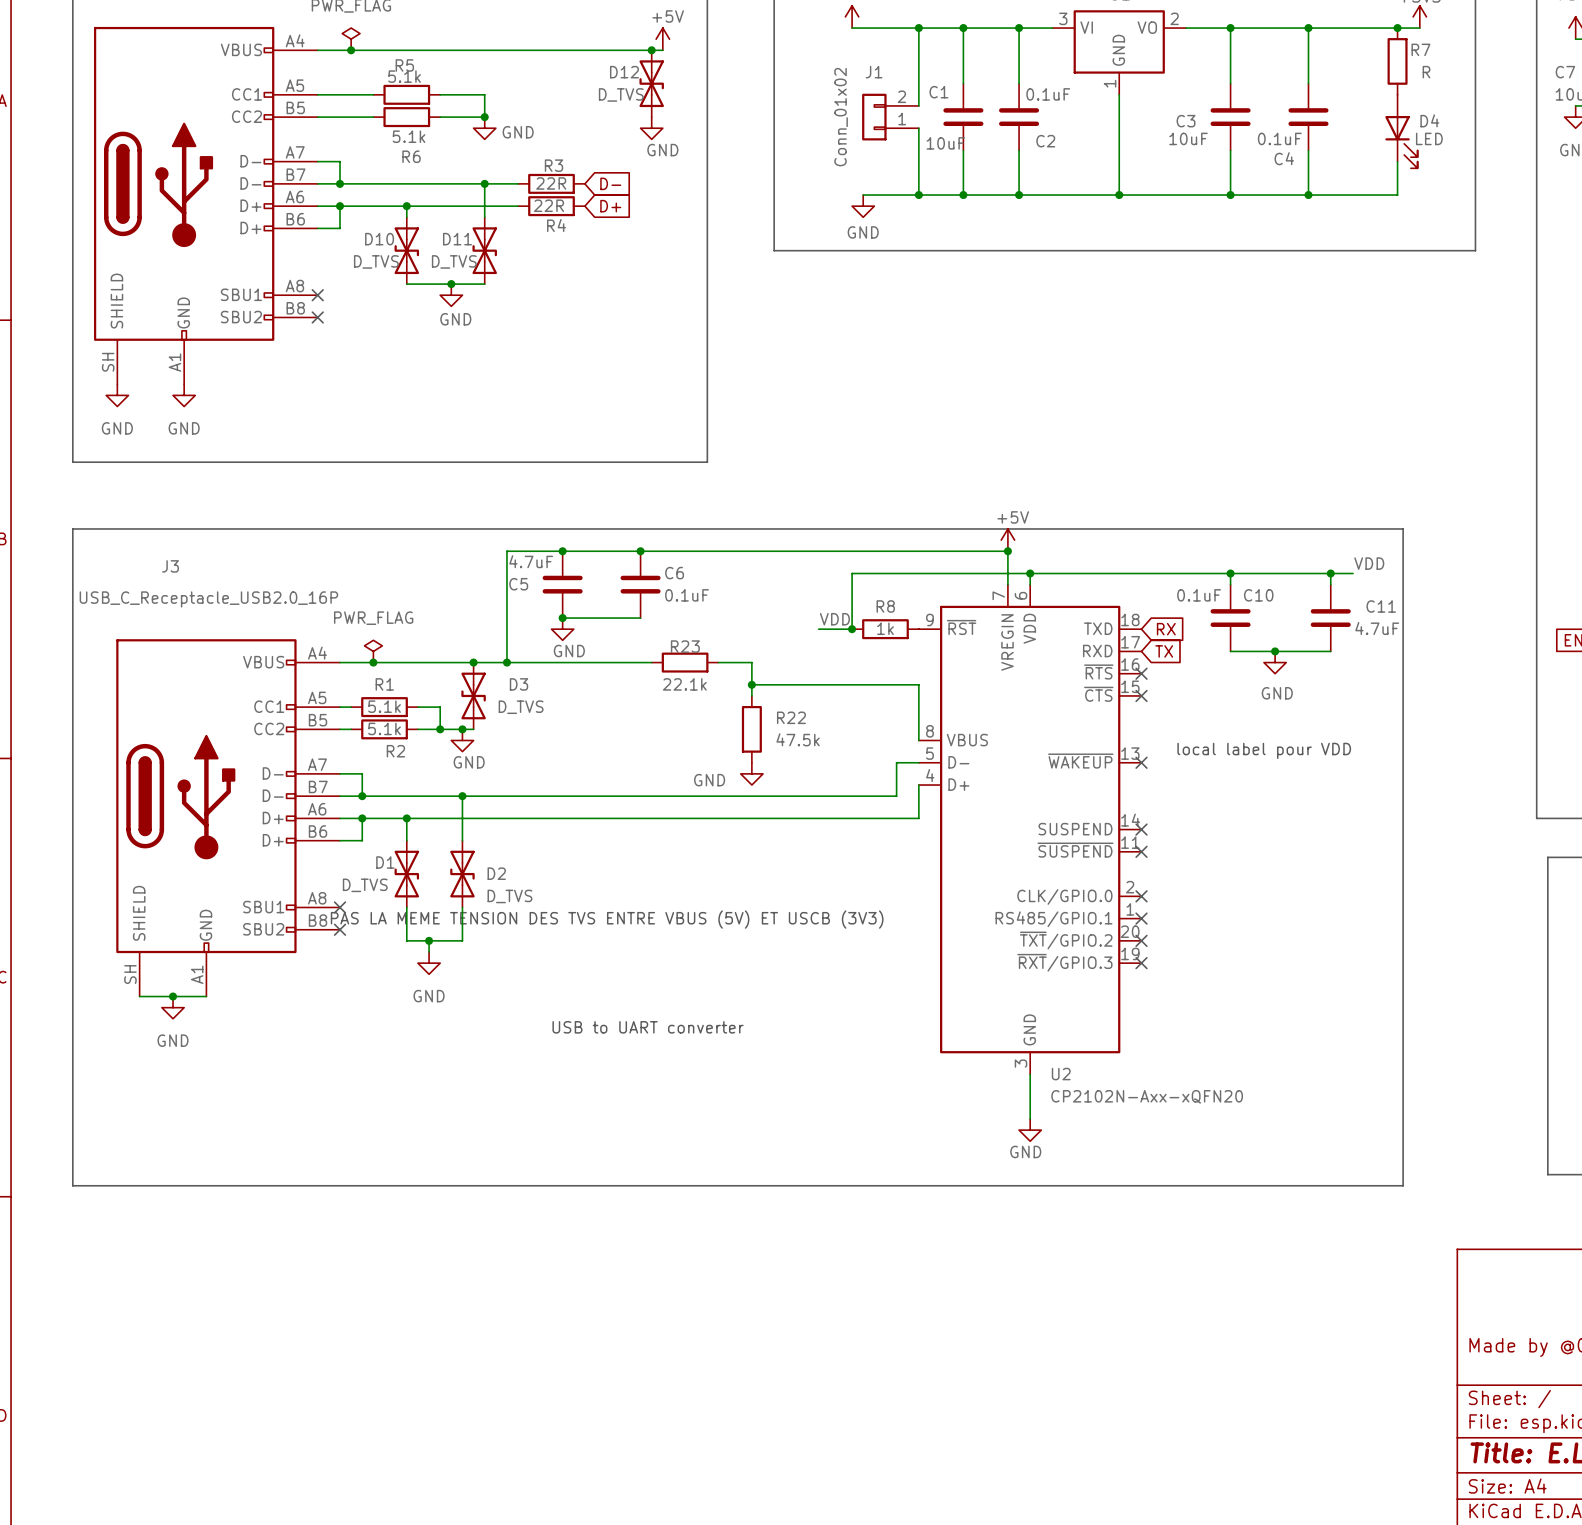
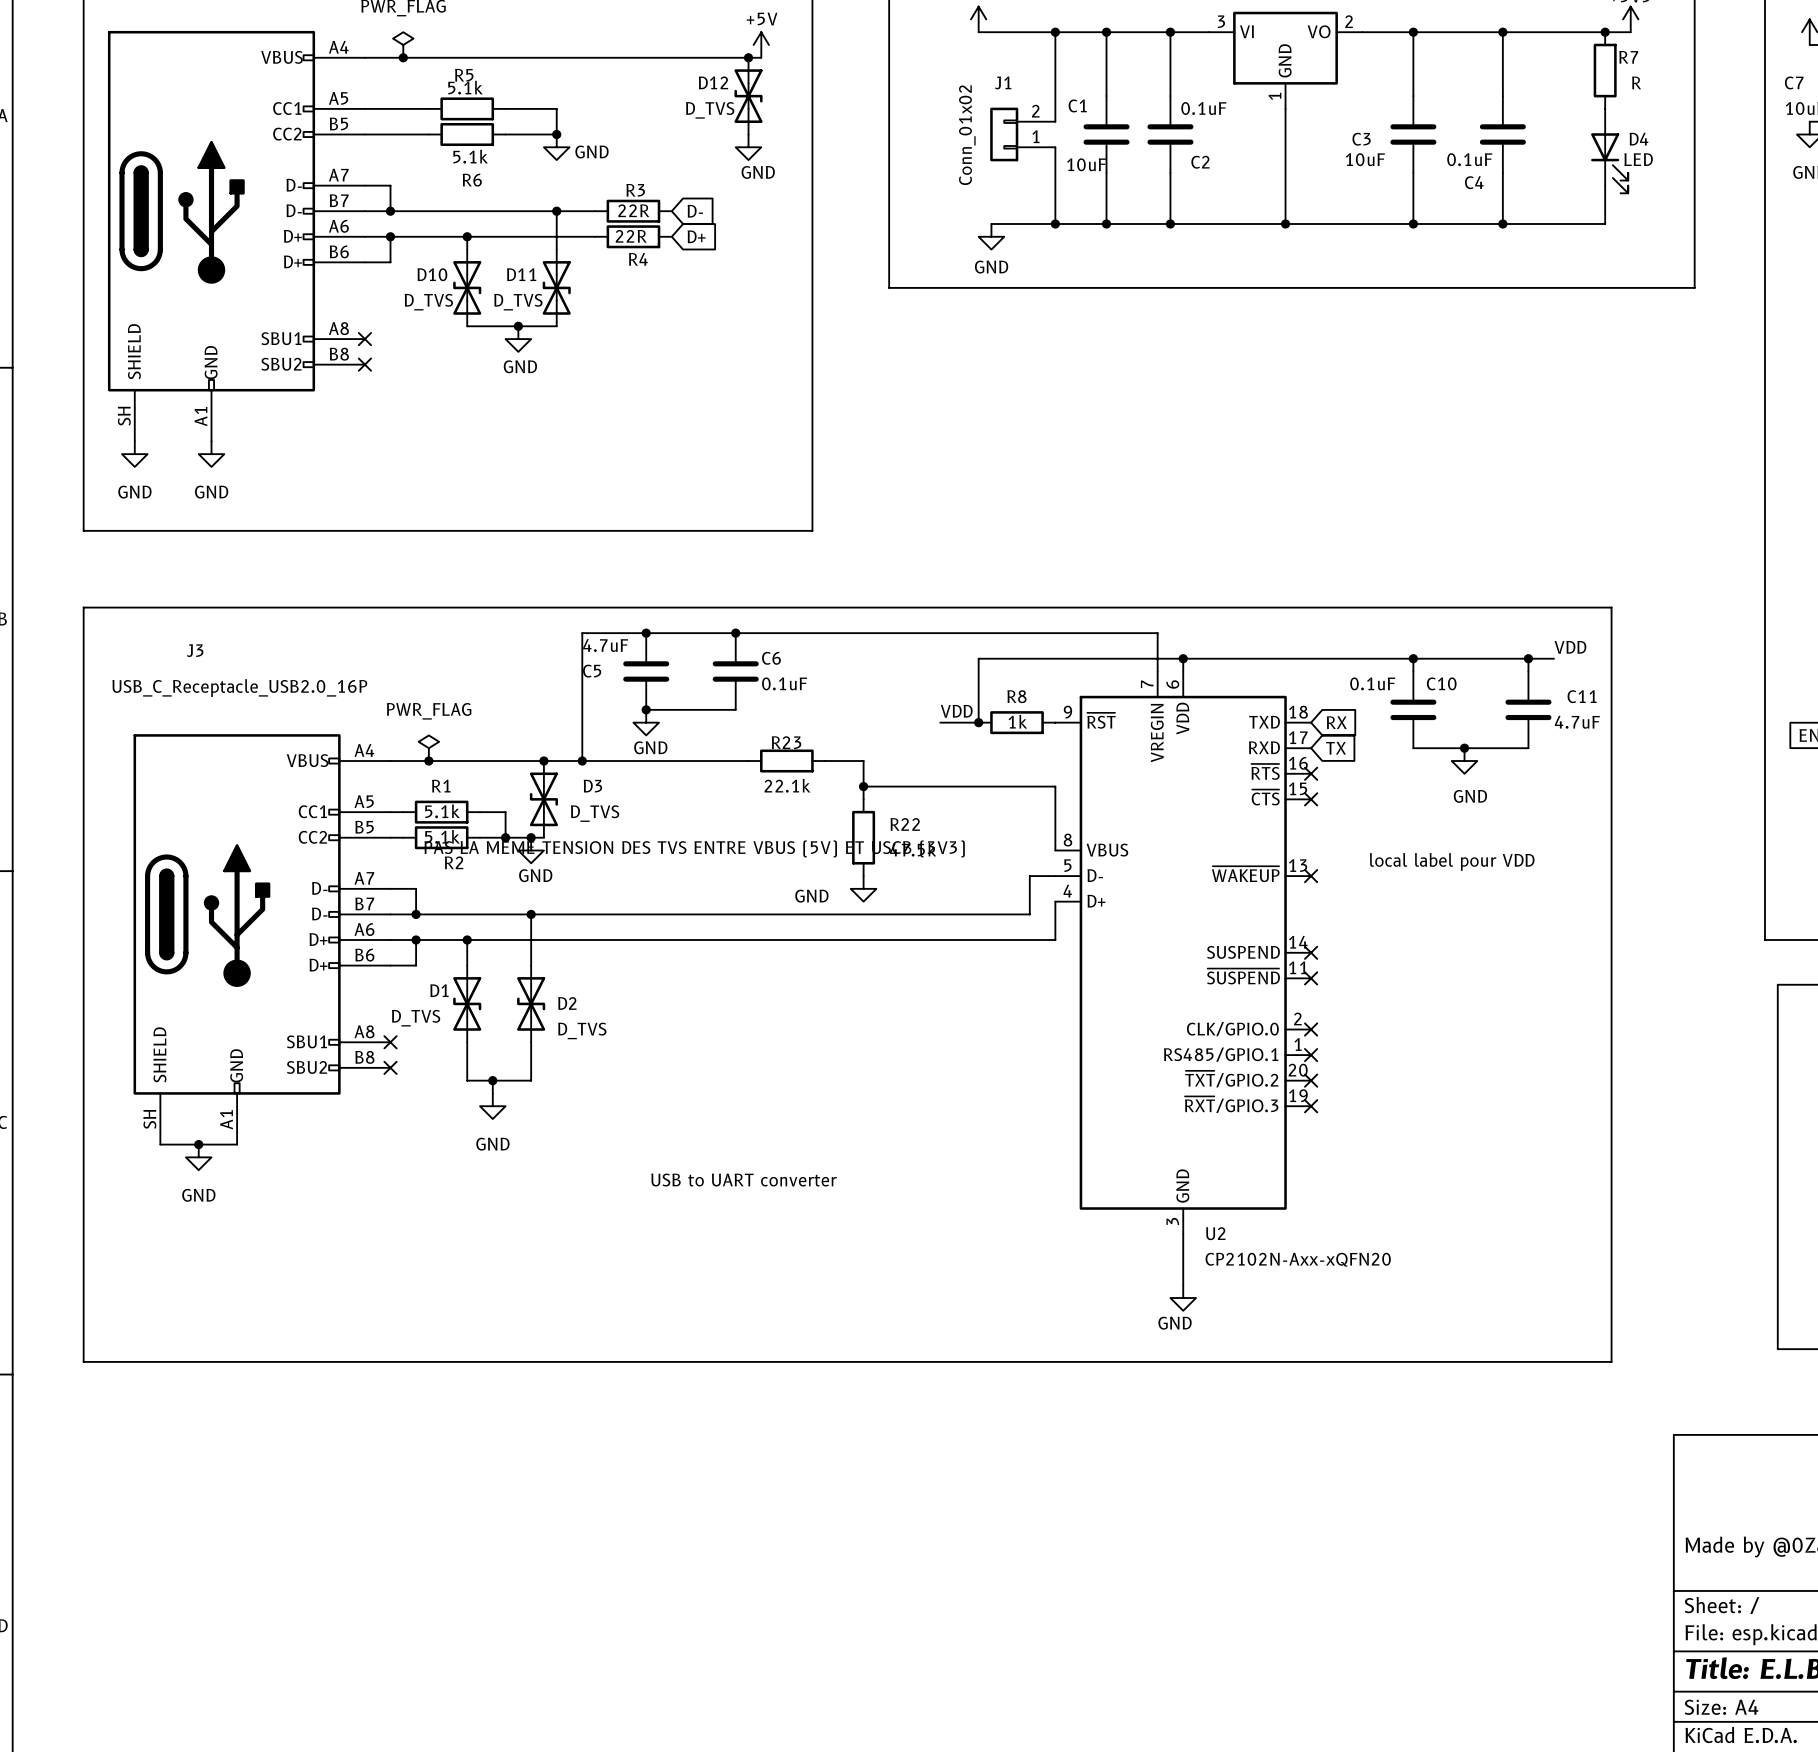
power symbol: +5V (1007, 540) -> none
junction: (1007, 551) -> none
text position: PAS LA MEME TENSION DES TVS ENTRE VBUS (5V) ET USCB (3V3) (607, 919) -> PAS LA MEME TENSION DES TVS ENTRE VBUS (5V) ET USCB (3V3) (694, 848)

